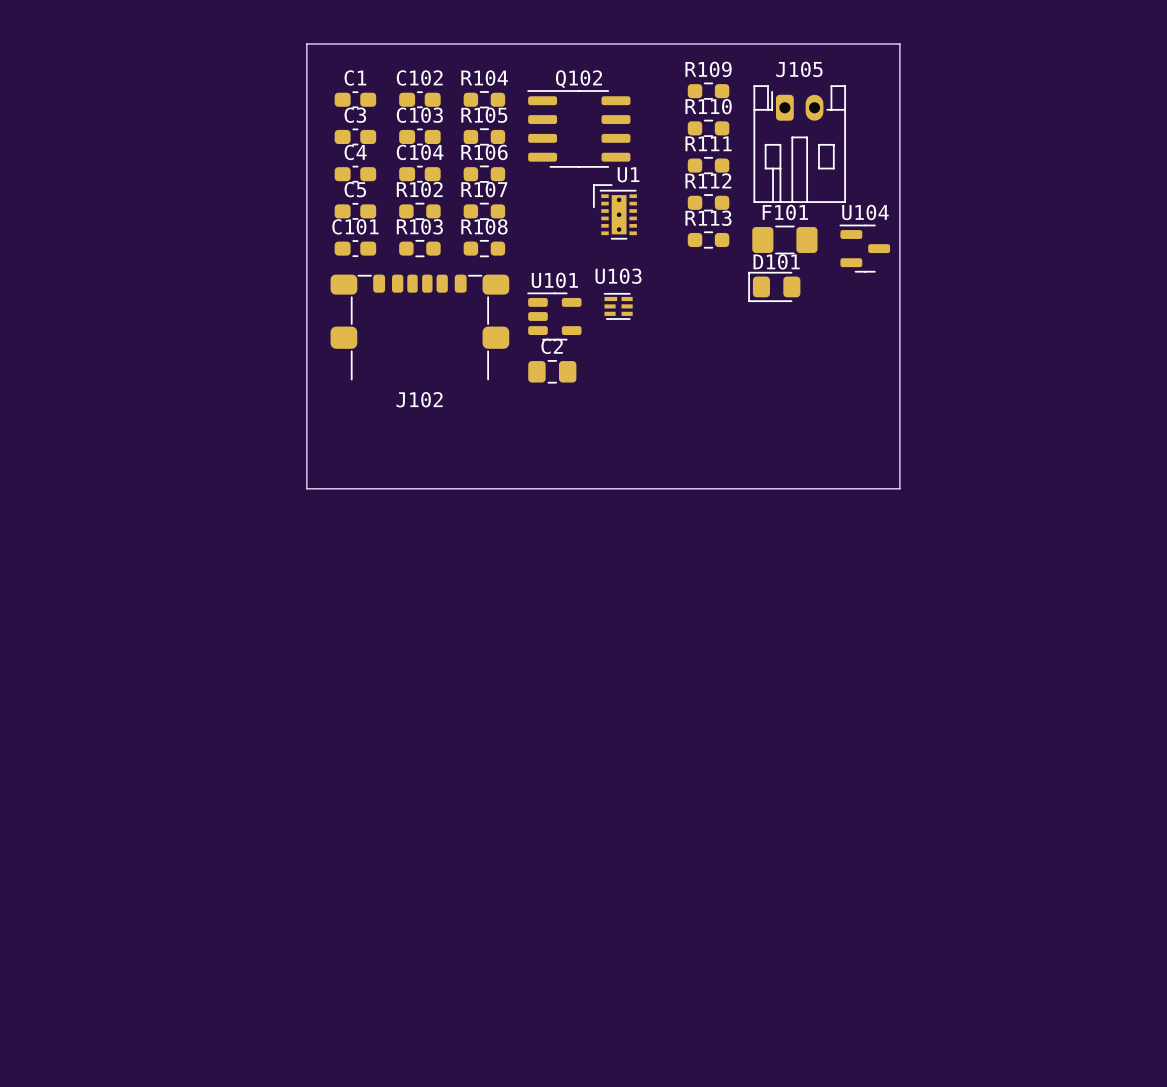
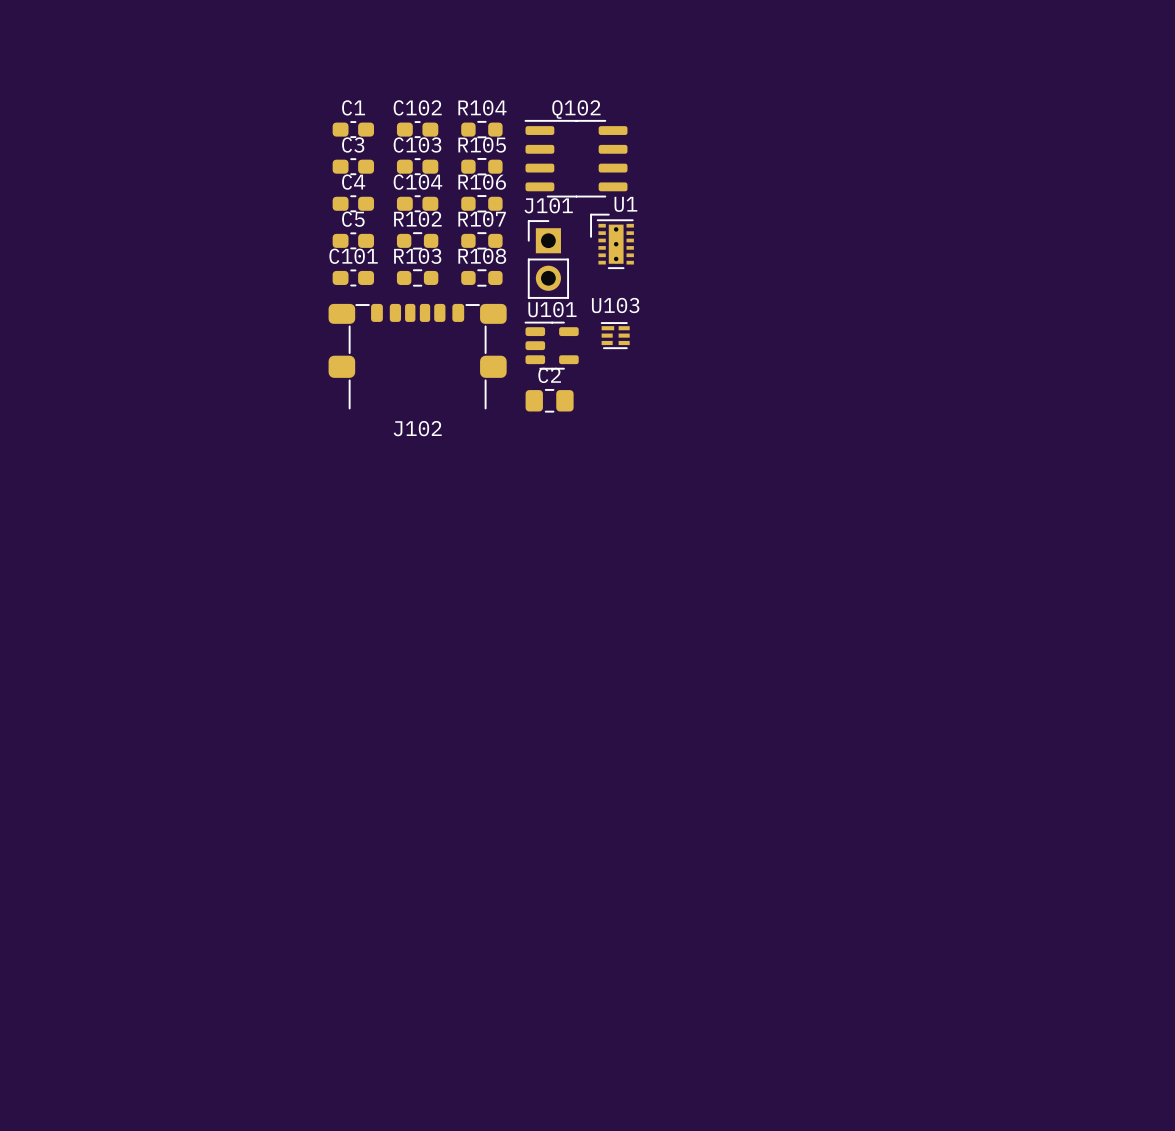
board edge: (306, 44) (899, 44) (899, 488) (306, 488) (306, 44) -> none
R109: (708, 91) -> none
R110: (708, 128) -> none
J105: (799, 144) -> none
R111: (708, 165) -> none
R112: (708, 202) -> none
J101: none -> (548, 259)
R113: (708, 239) -> none
F101: (784, 239) -> none
U104: (864, 248) -> none
D101: (774, 286) -> none

